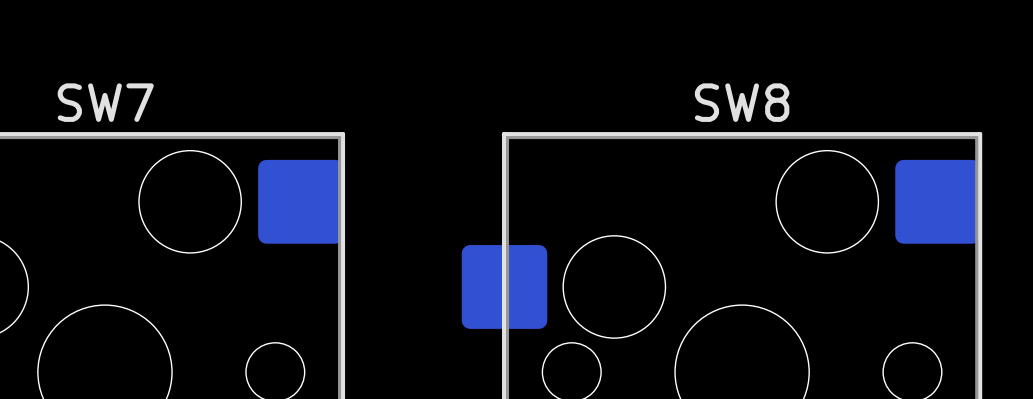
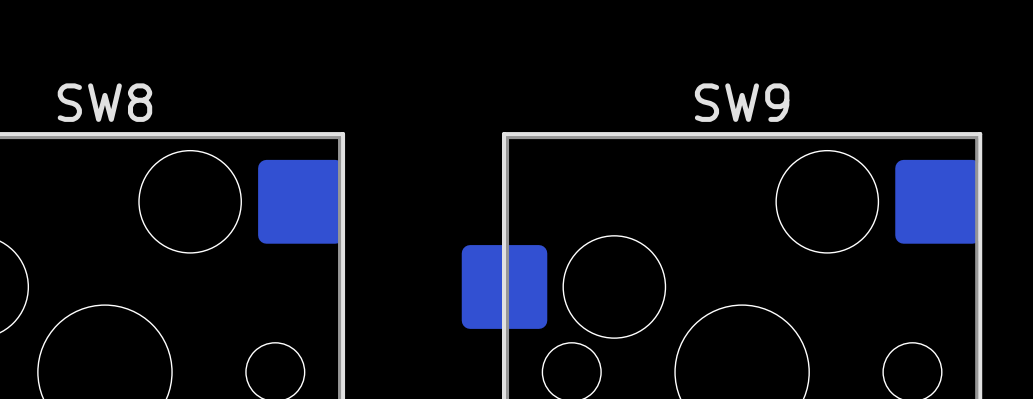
SW7 name: SW7 (105, 102) -> SW8 (104, 102)
SW8 name: SW8 (742, 102) -> SW9 (742, 102)

